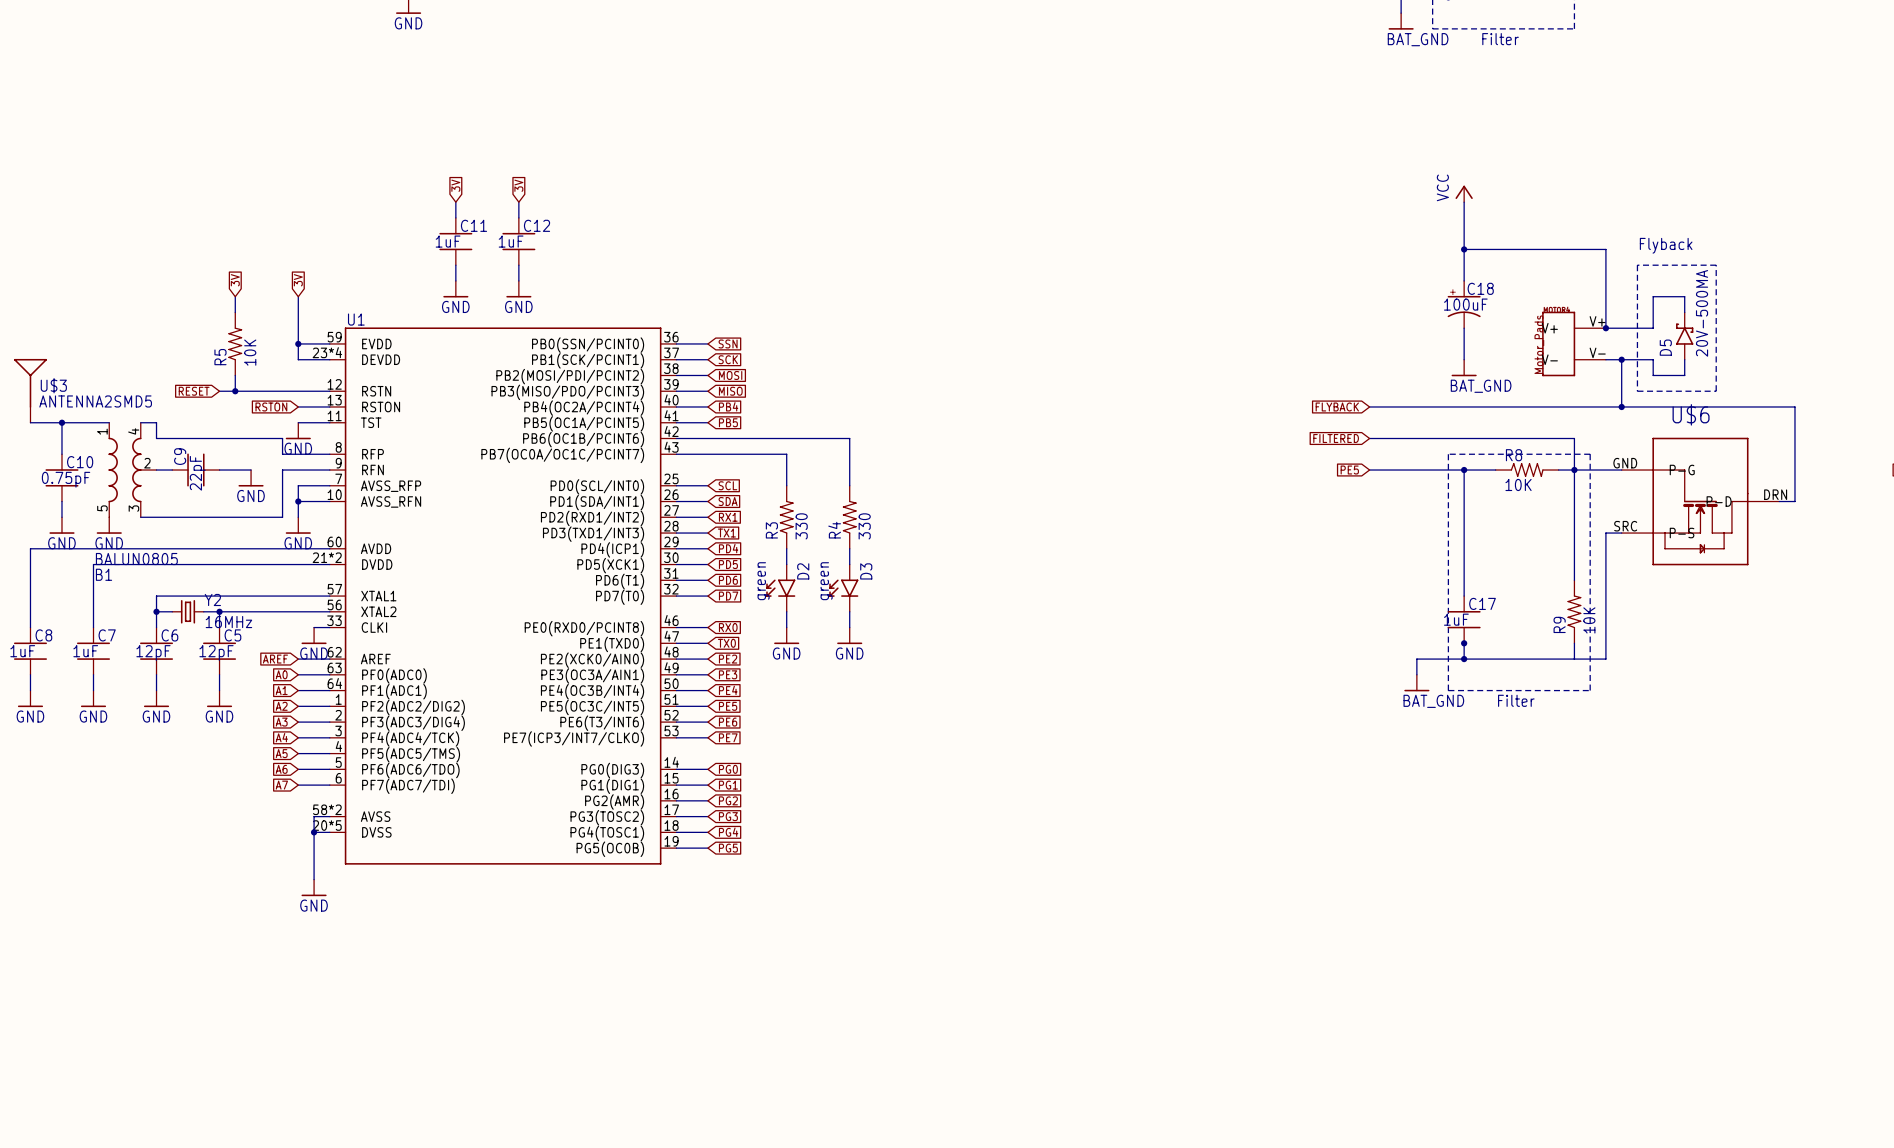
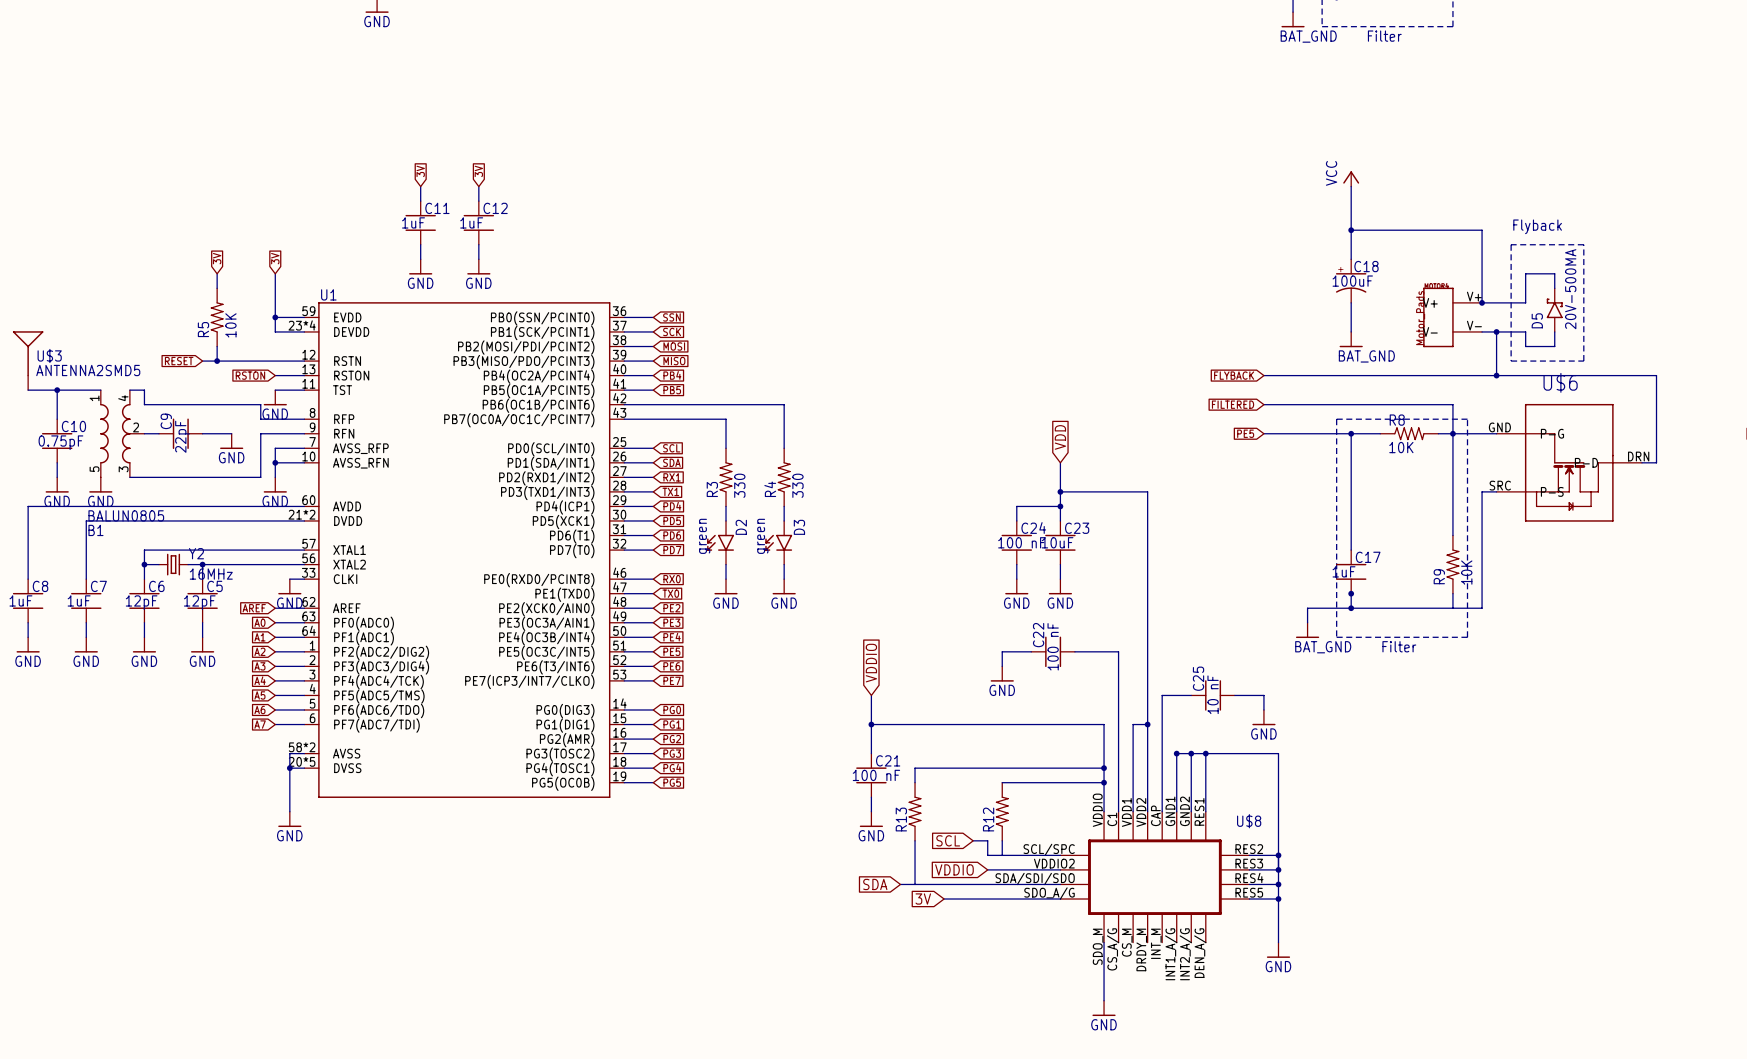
global label: none -> VDD (1060, 437)
wire: none -> (1060, 462) (1060, 520)
wire: none -> (1060, 491) (1147, 491) (1147, 811)
junction: none -> (1060, 491)
wire: none -> (1060, 506) (1016, 506) (1016, 520)
junction: none -> (1060, 506)
C24: none -> 100 nF (1016, 542)
C23: none -> 10uF (1060, 542)
wire: none -> (1016, 564) (1016, 579)
wire: none -> (1060, 564) (1060, 579)
power symbol: none -> GND (1016, 586)
power symbol: none -> GND (1060, 586)
wire: none -> (1031, 651) (1002, 651) (1002, 666)
C22: none -> 100 nF (1053, 651)
wire: none -> (1074, 651) (1118, 651) (1118, 811)
global label: none -> VDDIO (871, 663)
power symbol: none -> GND (1002, 674)
wire: none -> (871, 695) (871, 753)
wire: none -> (1191, 695) (1162, 695) (1162, 811)
C25: none -> 10 nF (1213, 695)
wire: none -> (1234, 695) (1263, 695) (1263, 709)
power symbol: none -> GND (1263, 717)
wire: none -> (871, 724) (1104, 724) (1104, 811)
junction: none -> (871, 724)
wire: none -> (1147, 724) (1133, 724) (1133, 811)
junction: none -> (1147, 724)
junction: none -> (1176, 753)
wire: none -> (1191, 753) (1191, 811)
junction: none -> (1191, 753)
wire: none -> (1205, 753) (1205, 811)
junction: none -> (1205, 753)
wire: none -> (1104, 768) (915, 768) (915, 782)
junction: none -> (1104, 768)
C21: none -> 100 nF (871, 775)
wire: none -> (1002, 782) (1104, 782)
junction: none -> (1104, 782)
wire: none -> (871, 797) (871, 811)
R13: none -> (915, 811)
R12: none -> (1002, 811)
wire: none -> (1176, 811) (1176, 753) (1278, 753) (1278, 942)
power symbol: none -> GND (871, 819)
wire: none -> (915, 840) (915, 884)
global label: none -> SCL (948, 840)
wire: none -> (973, 840) (987, 840) (987, 855) (1060, 855)
wire: none -> (1002, 840) (1002, 855)
wire: none -> (1249, 855) (1278, 855)
junction: none -> (1278, 855)
global label: none -> VDDIO (954, 869)
wire: none -> (987, 869) (1060, 869)
wire: none -> (1249, 869) (1278, 869)
junction: none -> (1278, 869)
U$8: none -> (1154, 877)
global label: none -> SDA (875, 884)
wire: none -> (900, 884) (1060, 884)
wire: none -> (1249, 884) (1278, 884)
junction: none -> (1278, 884)
global label: none -> 3V (923, 899)
wire: none -> (944, 899) (1060, 899)
wire: none -> (1249, 899) (1278, 899)
junction: none -> (1278, 899)
wire: none -> (1104, 942) (1104, 1000)
power symbol: none -> GND (1278, 950)
power symbol: none -> GND (1104, 1008)

